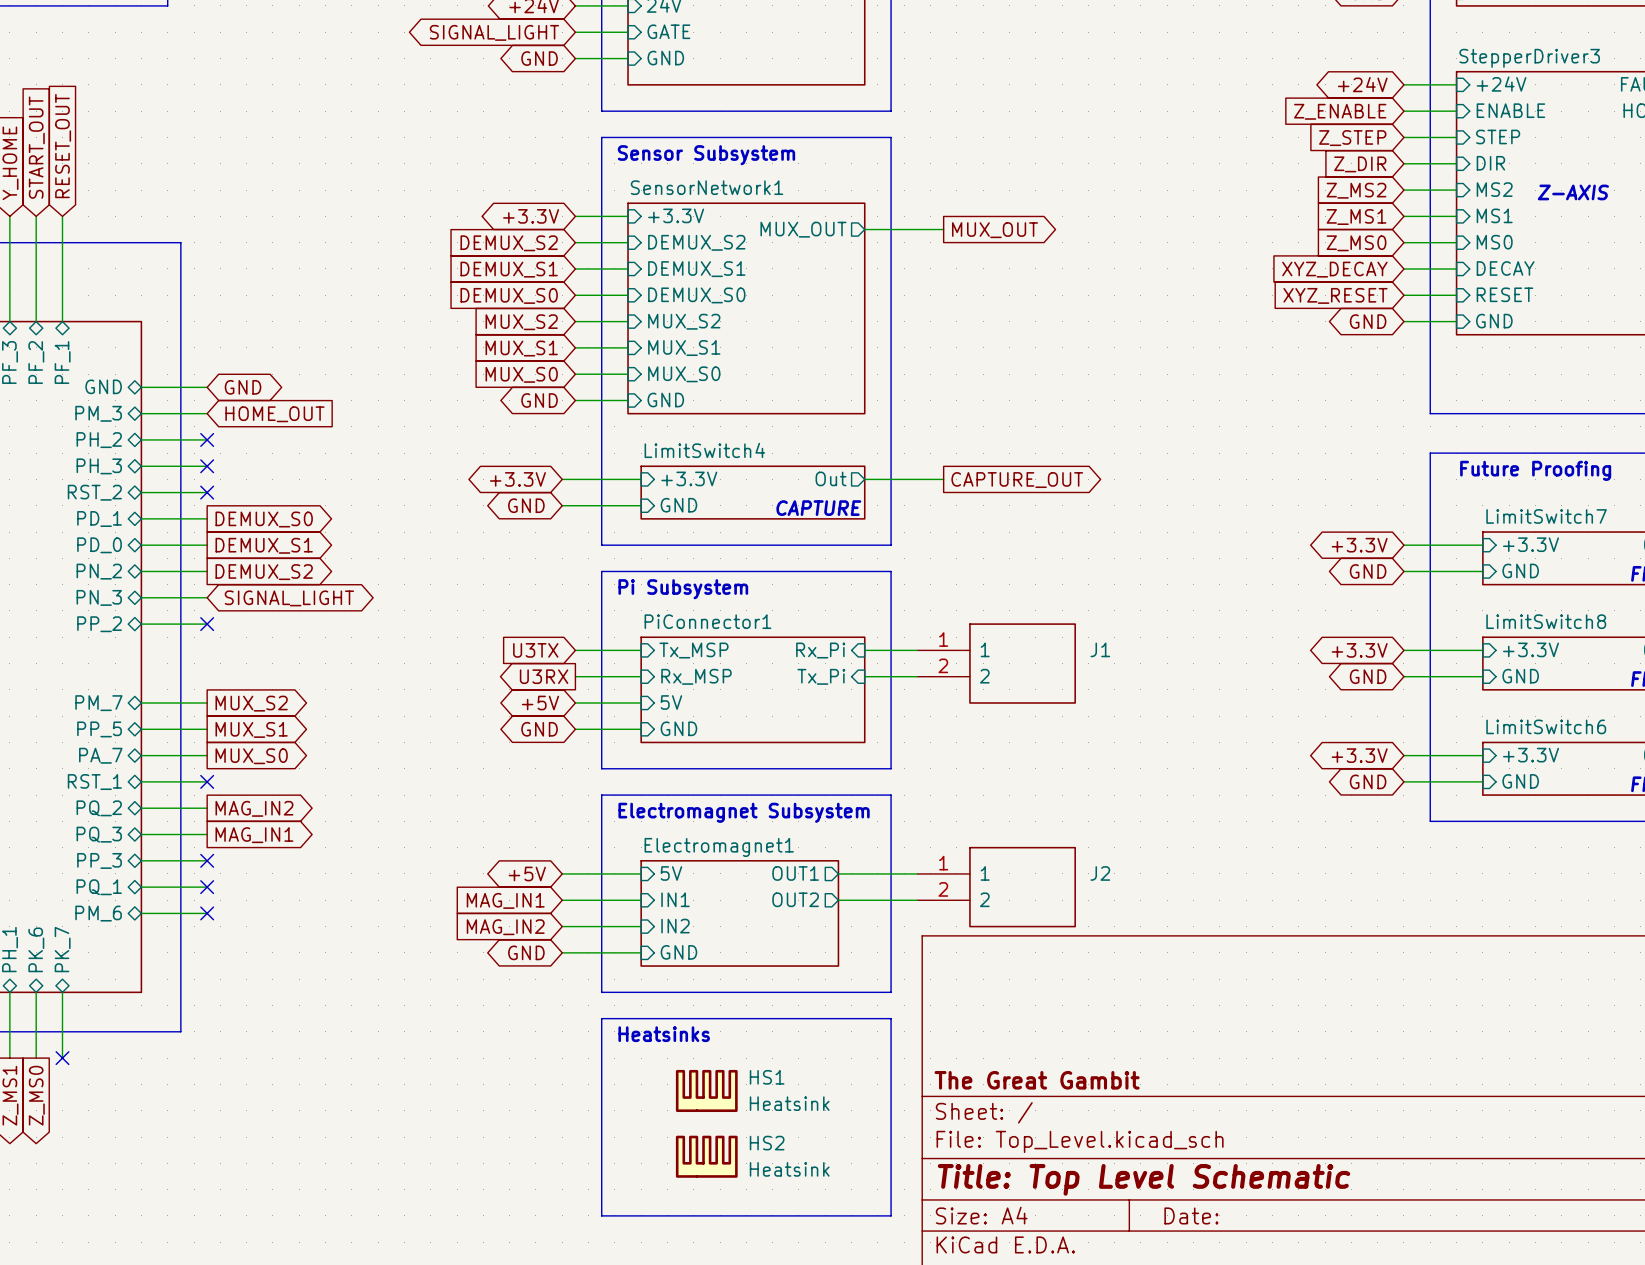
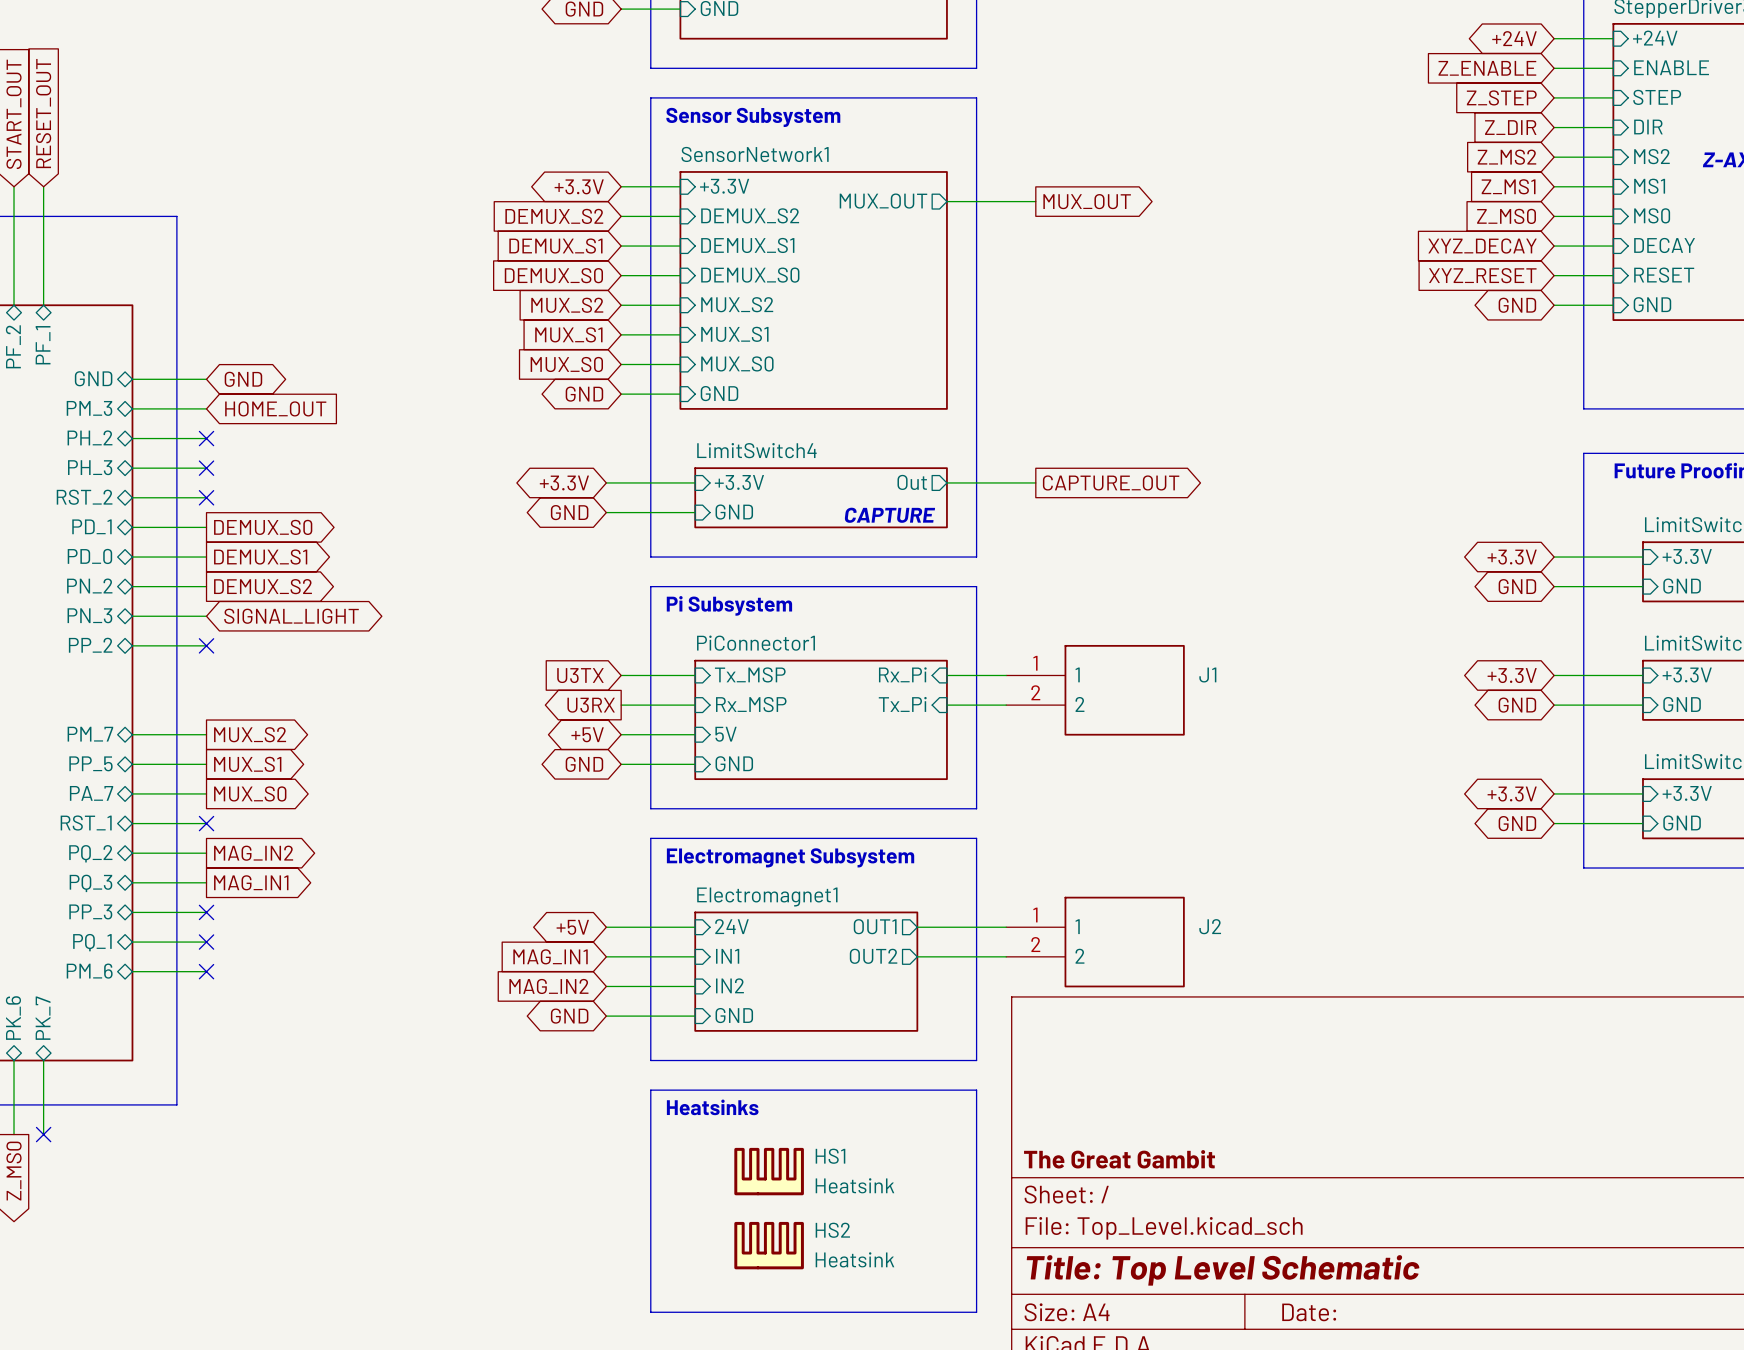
sheet pin: 5V (671, 873) -> 24V (732, 926)

